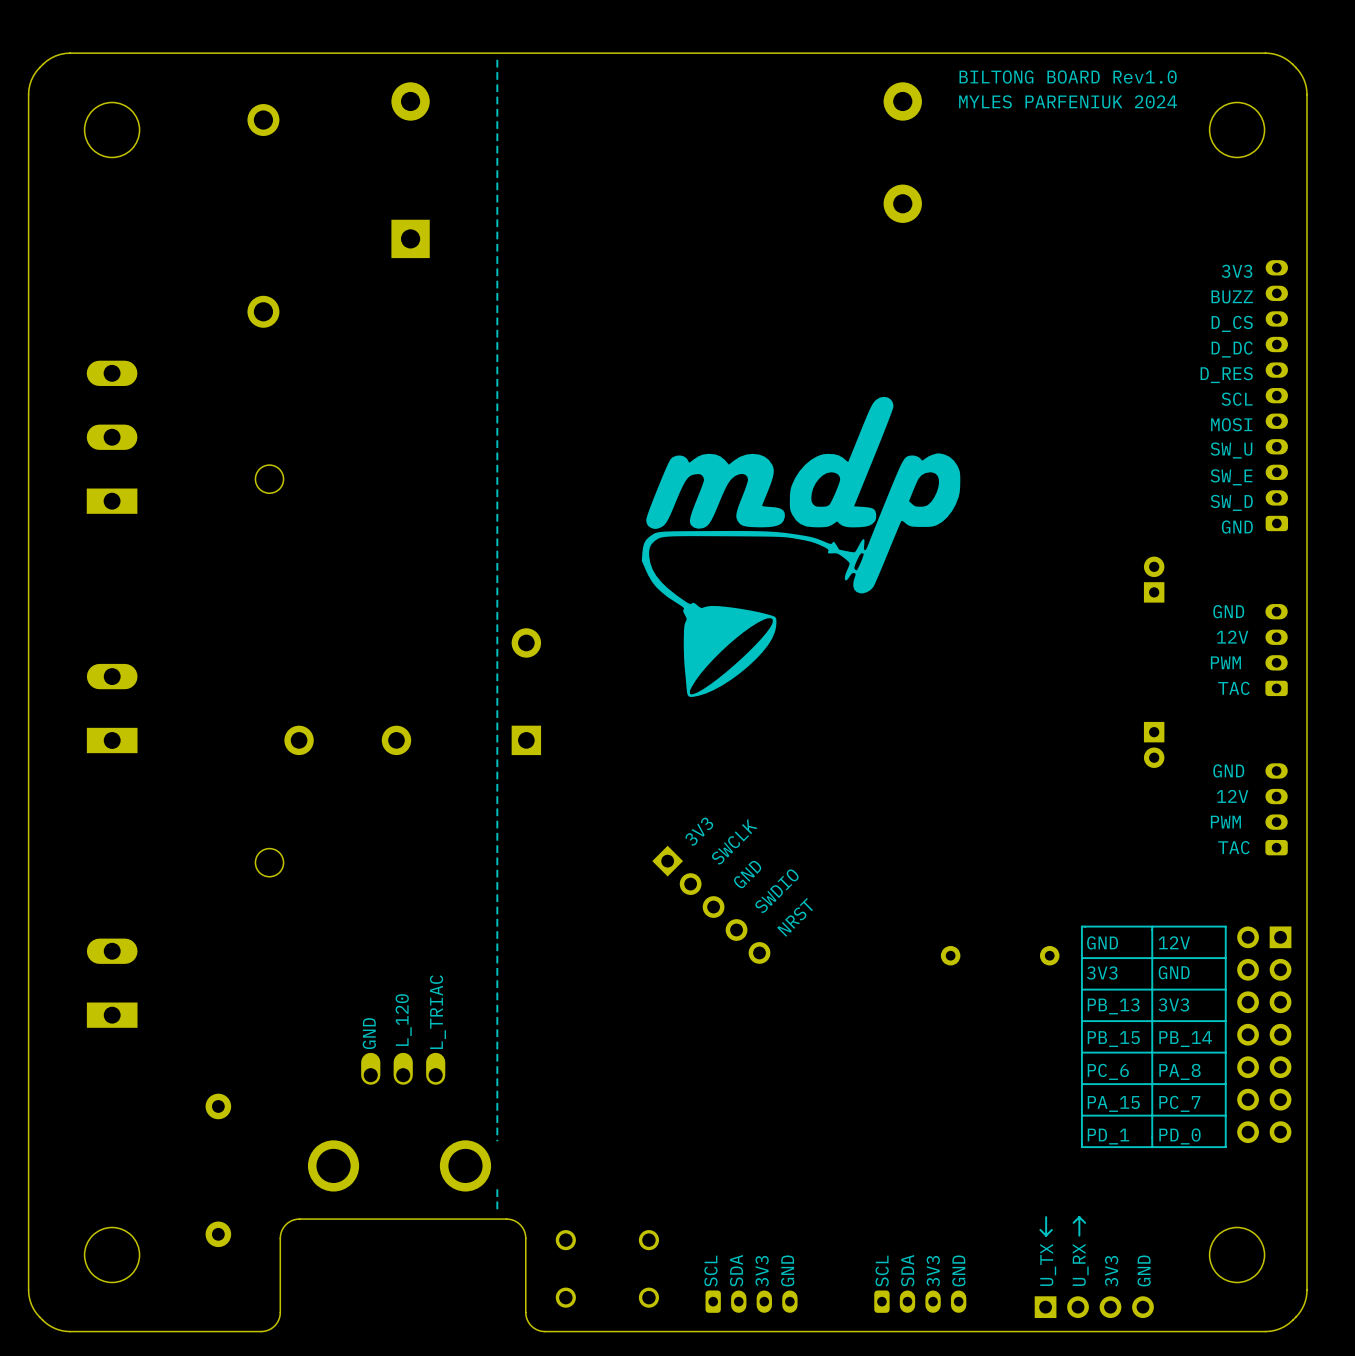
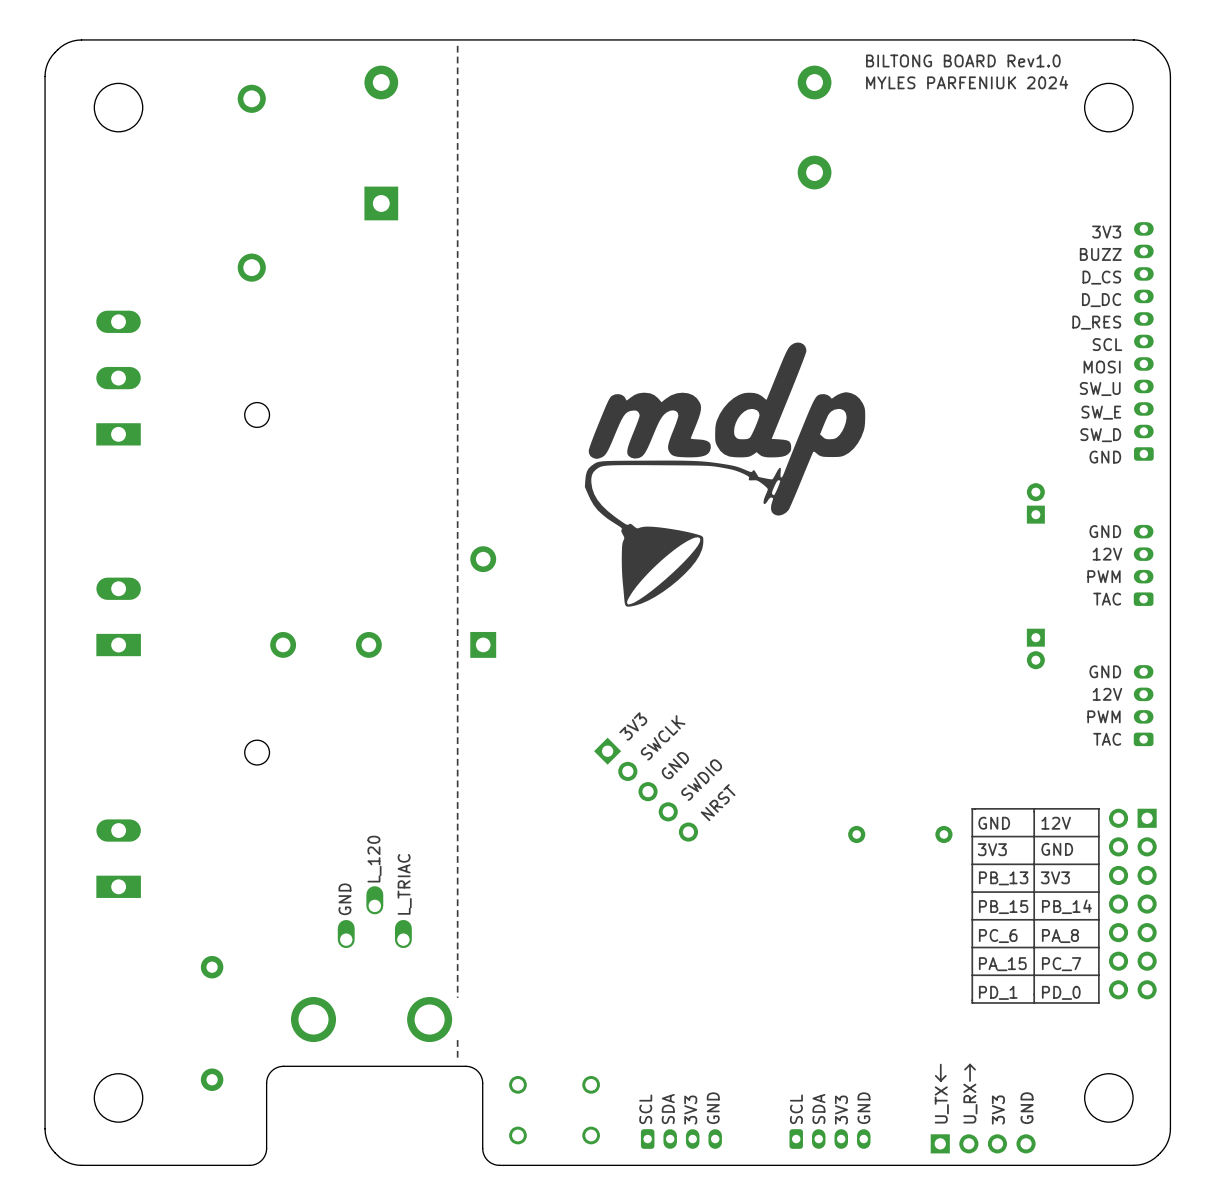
text position: L_120 (403, 1020) -> L_120 (374, 859)
part: none -> (374, 917)
part: (403, 1068) -> none

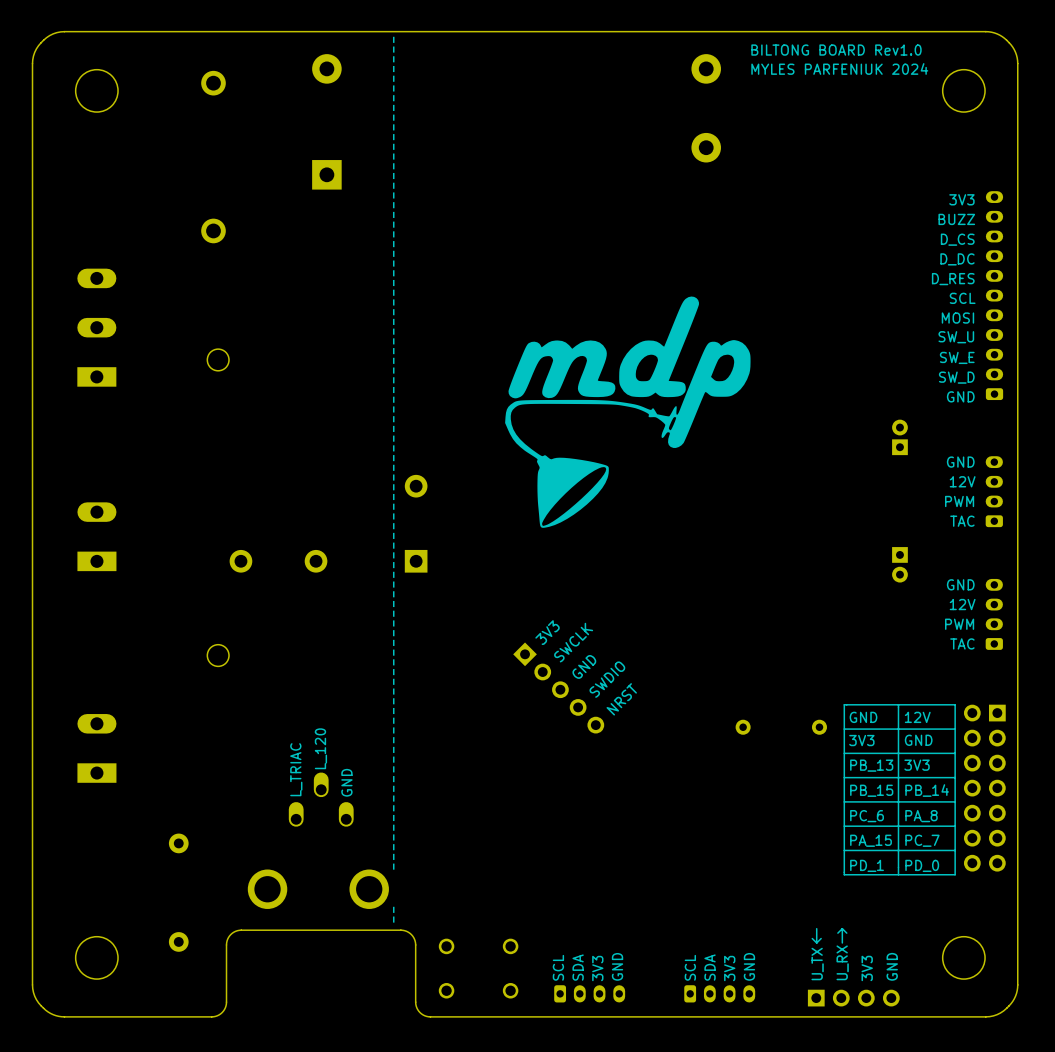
text position: L_TRIAC (404, 884) -> L_TRIAC (296, 769)
text position: GND (344, 899) -> GND (346, 782)

